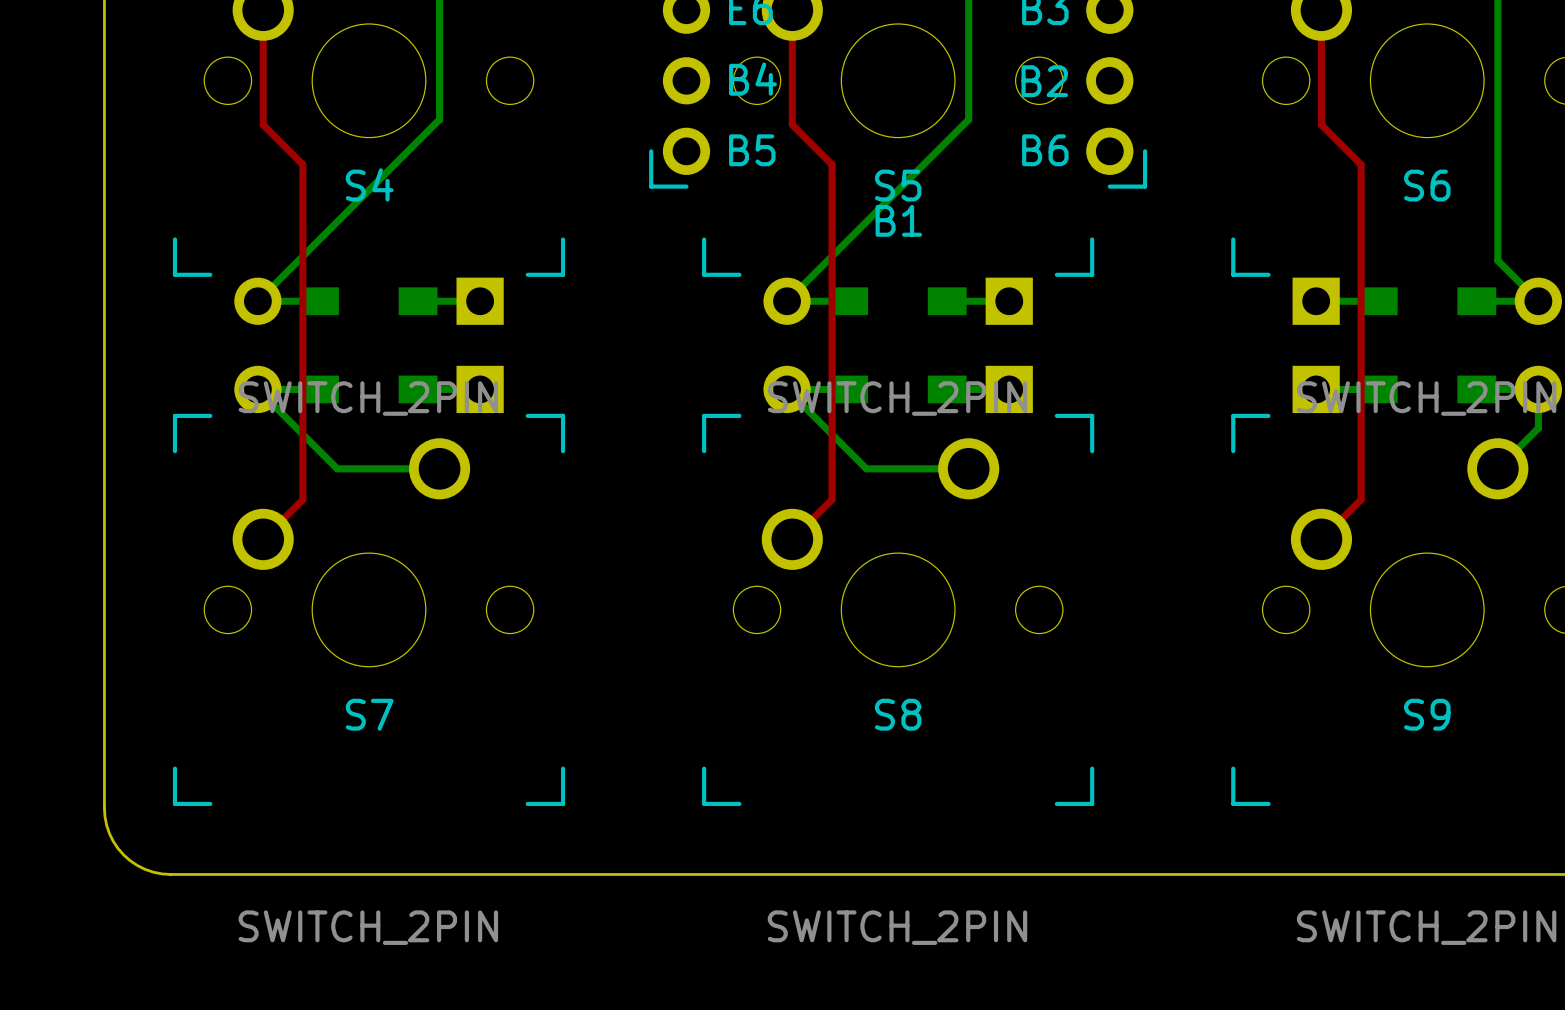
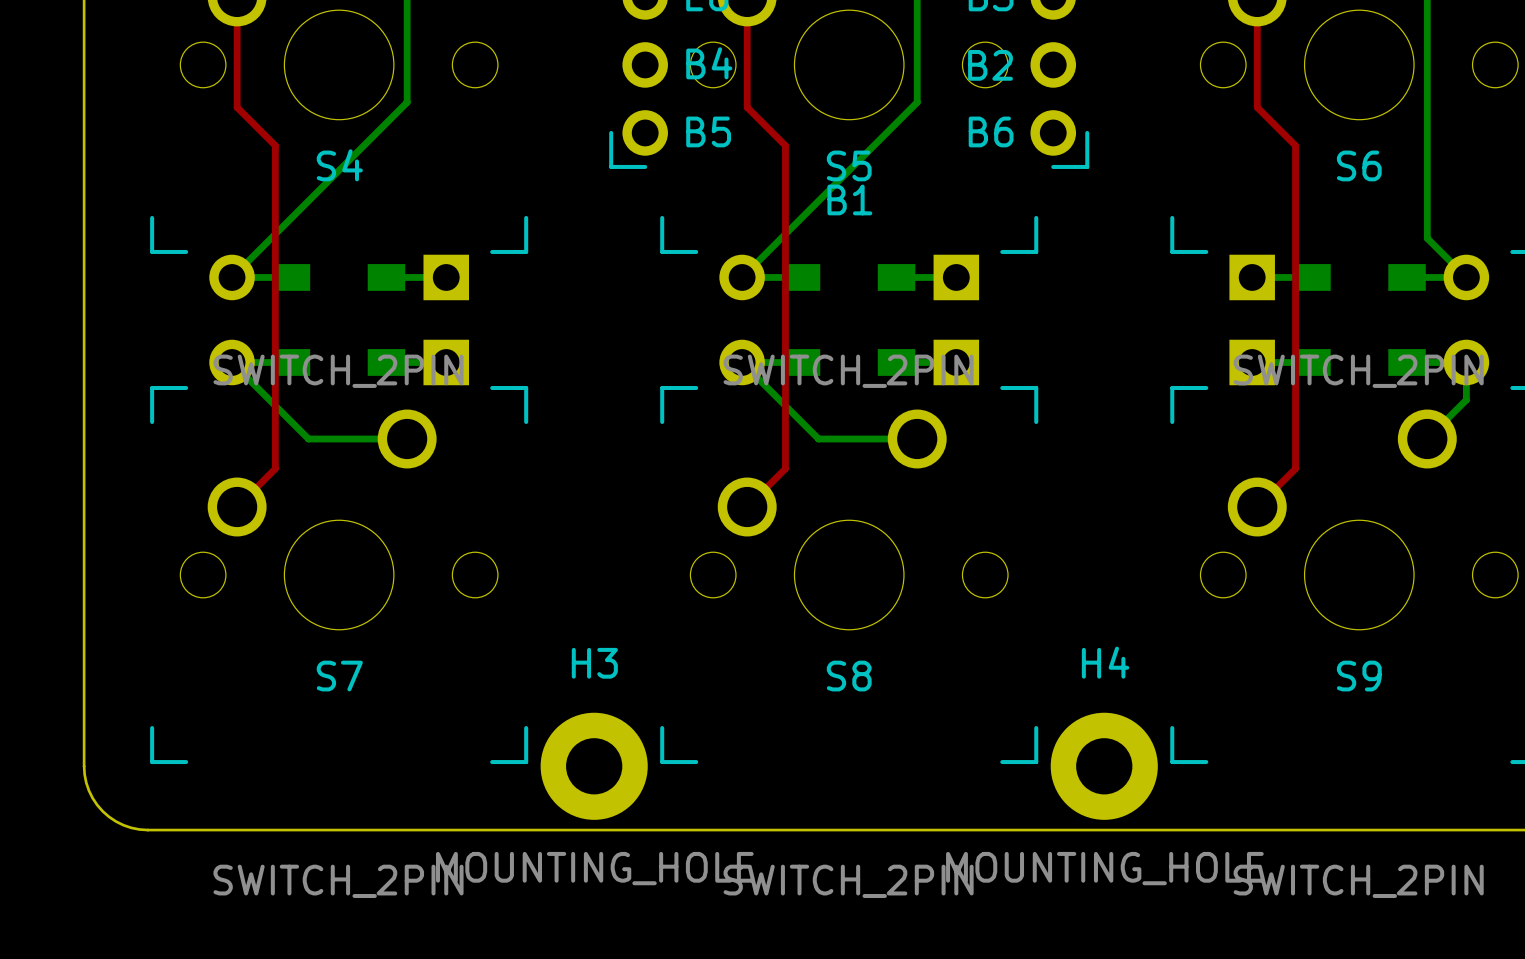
H3: none -> MOUNTING_HOLE (594, 766)
H4: none -> MOUNTING_HOLE (1104, 766)

